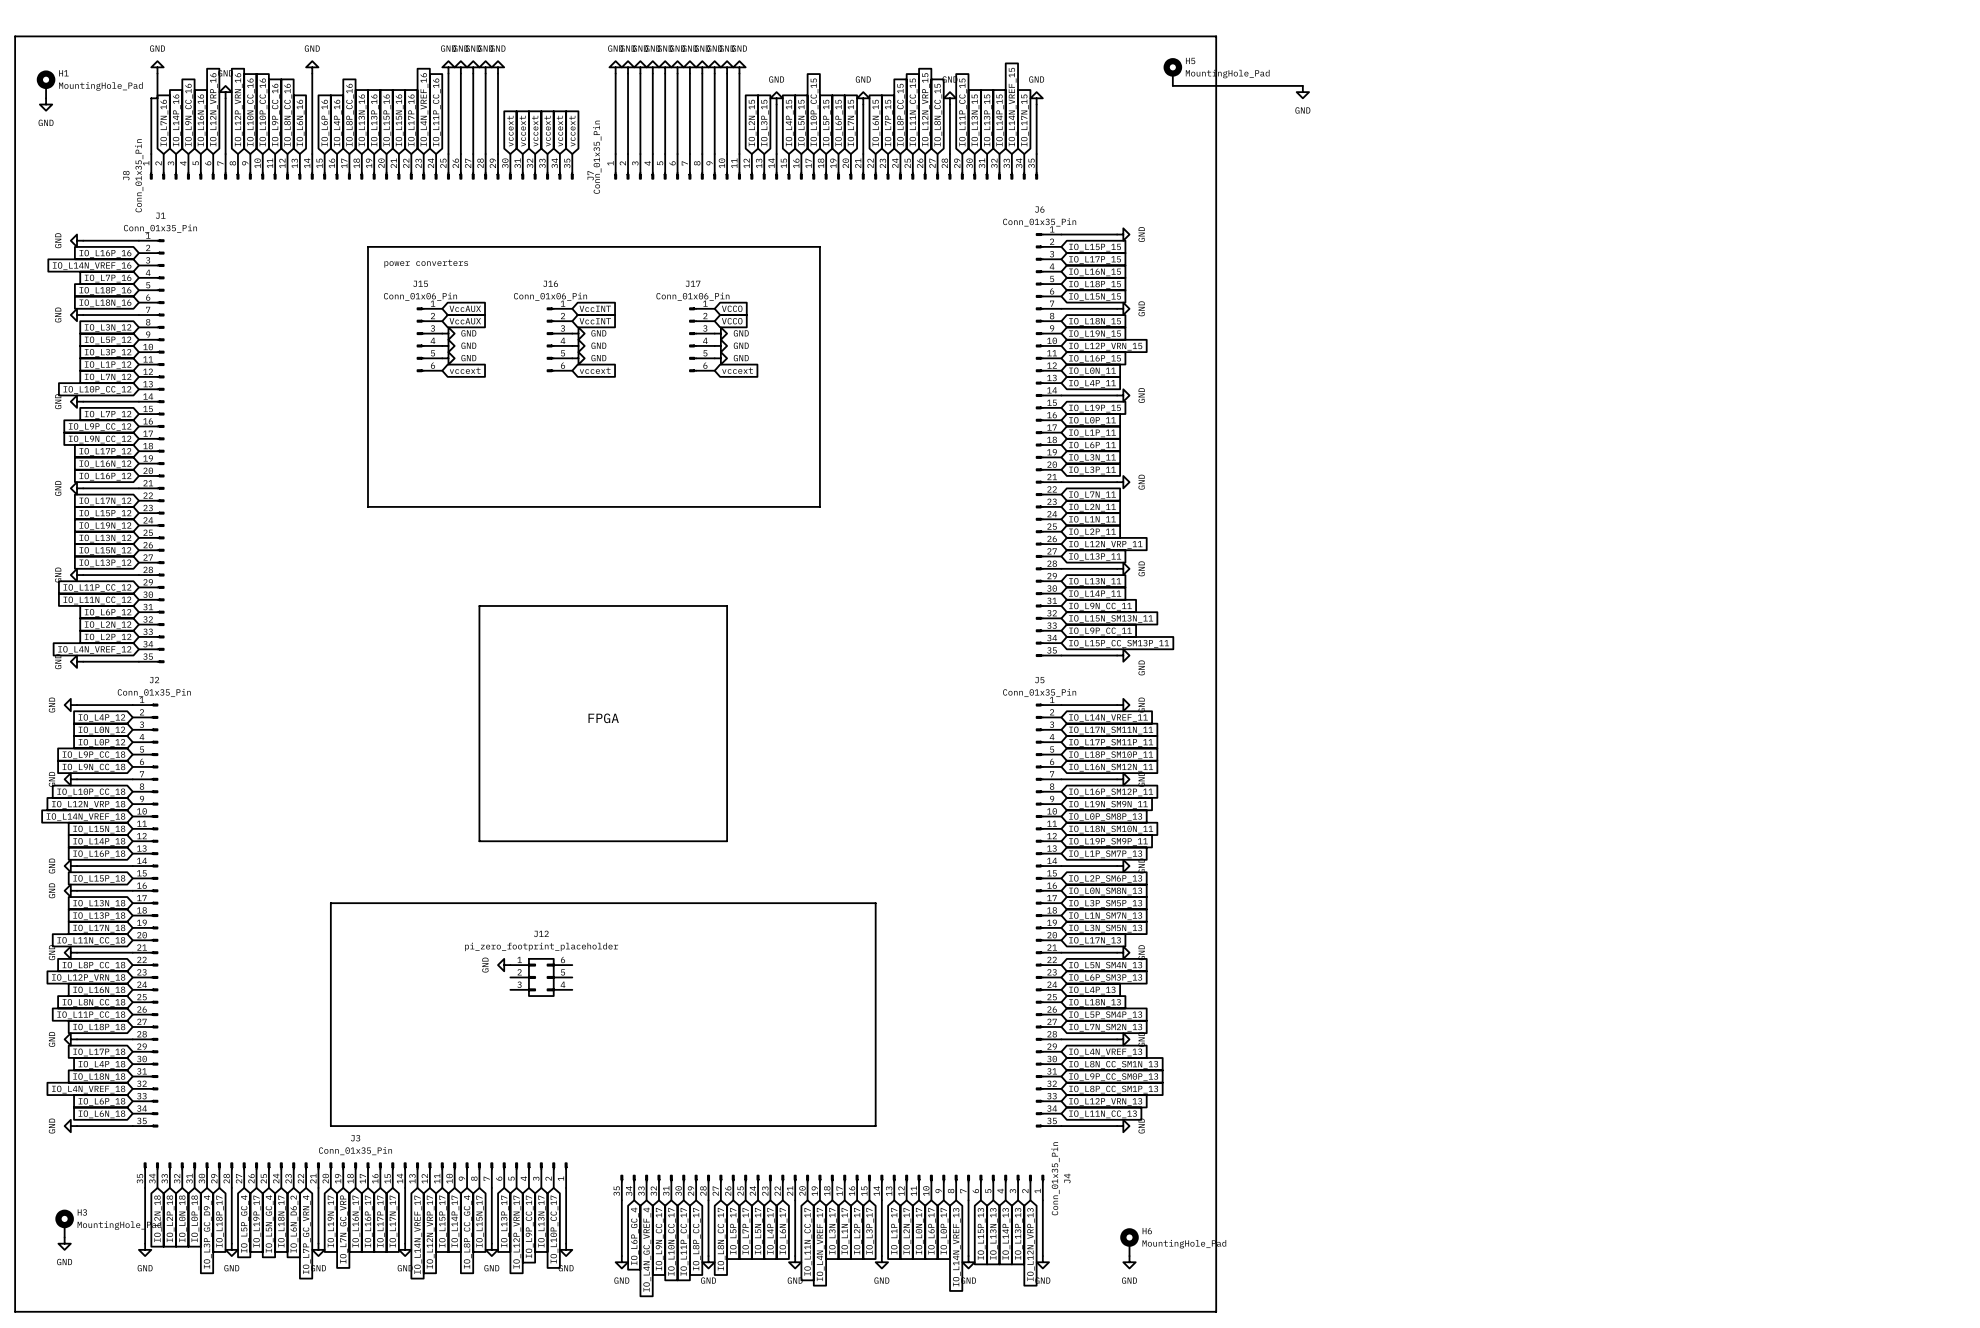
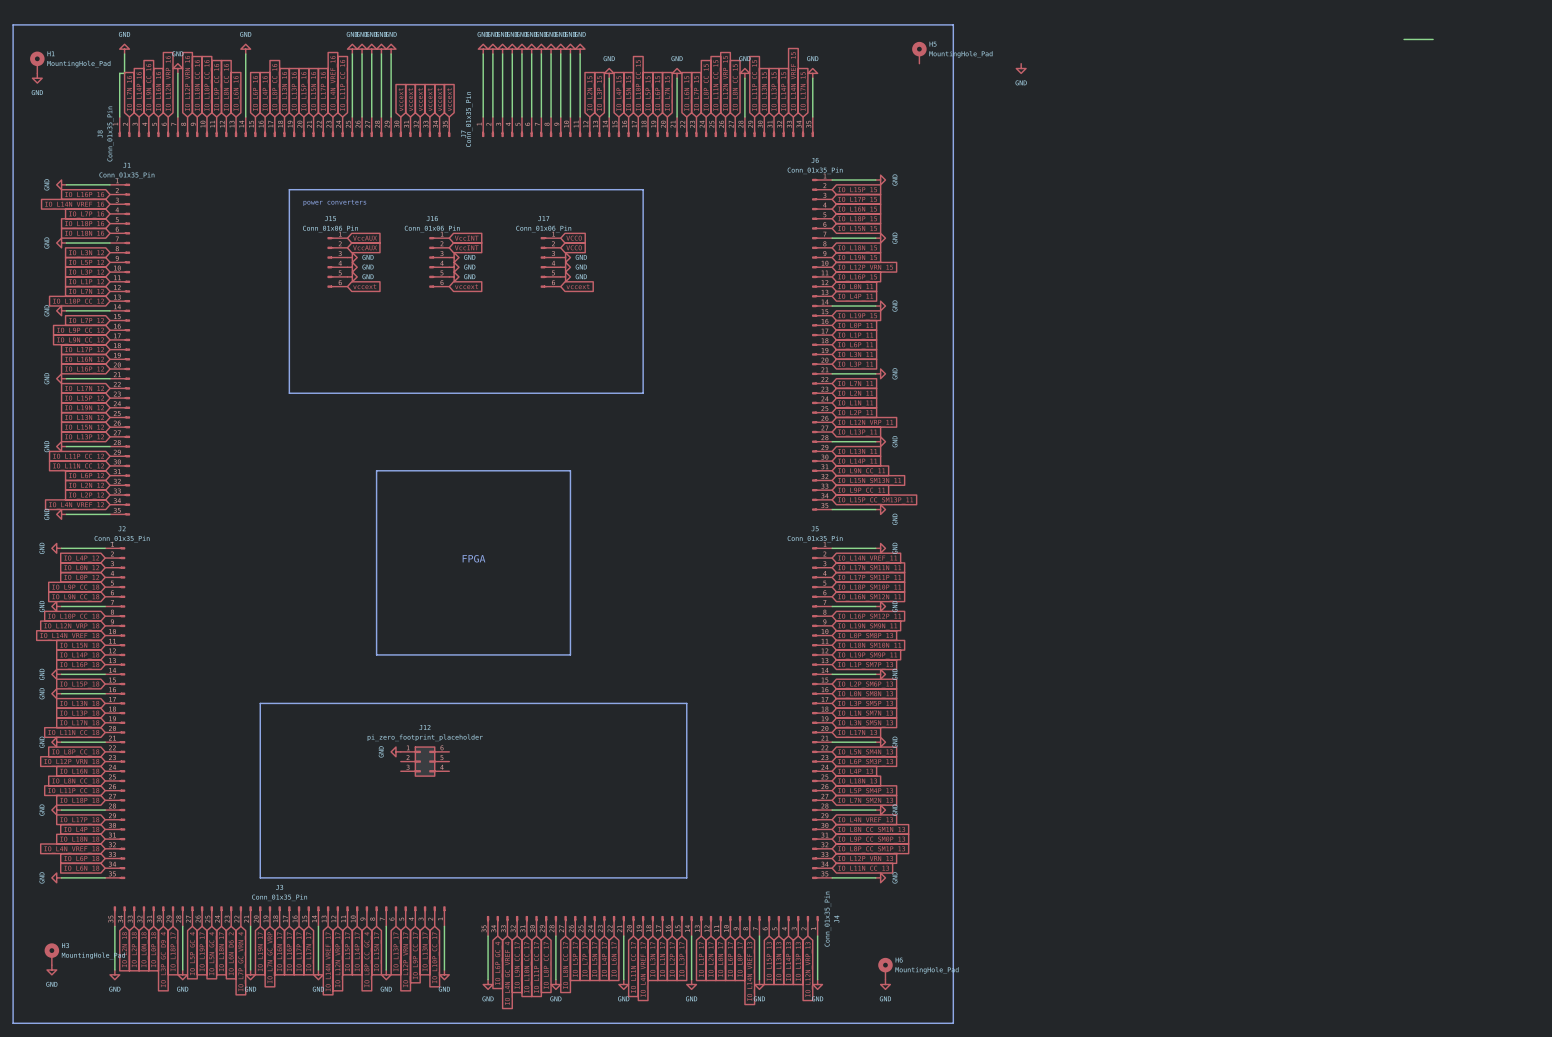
wire: none -> (1404, 39) (1433, 39)
wire: (1172, 85) (1302, 85) -> none

